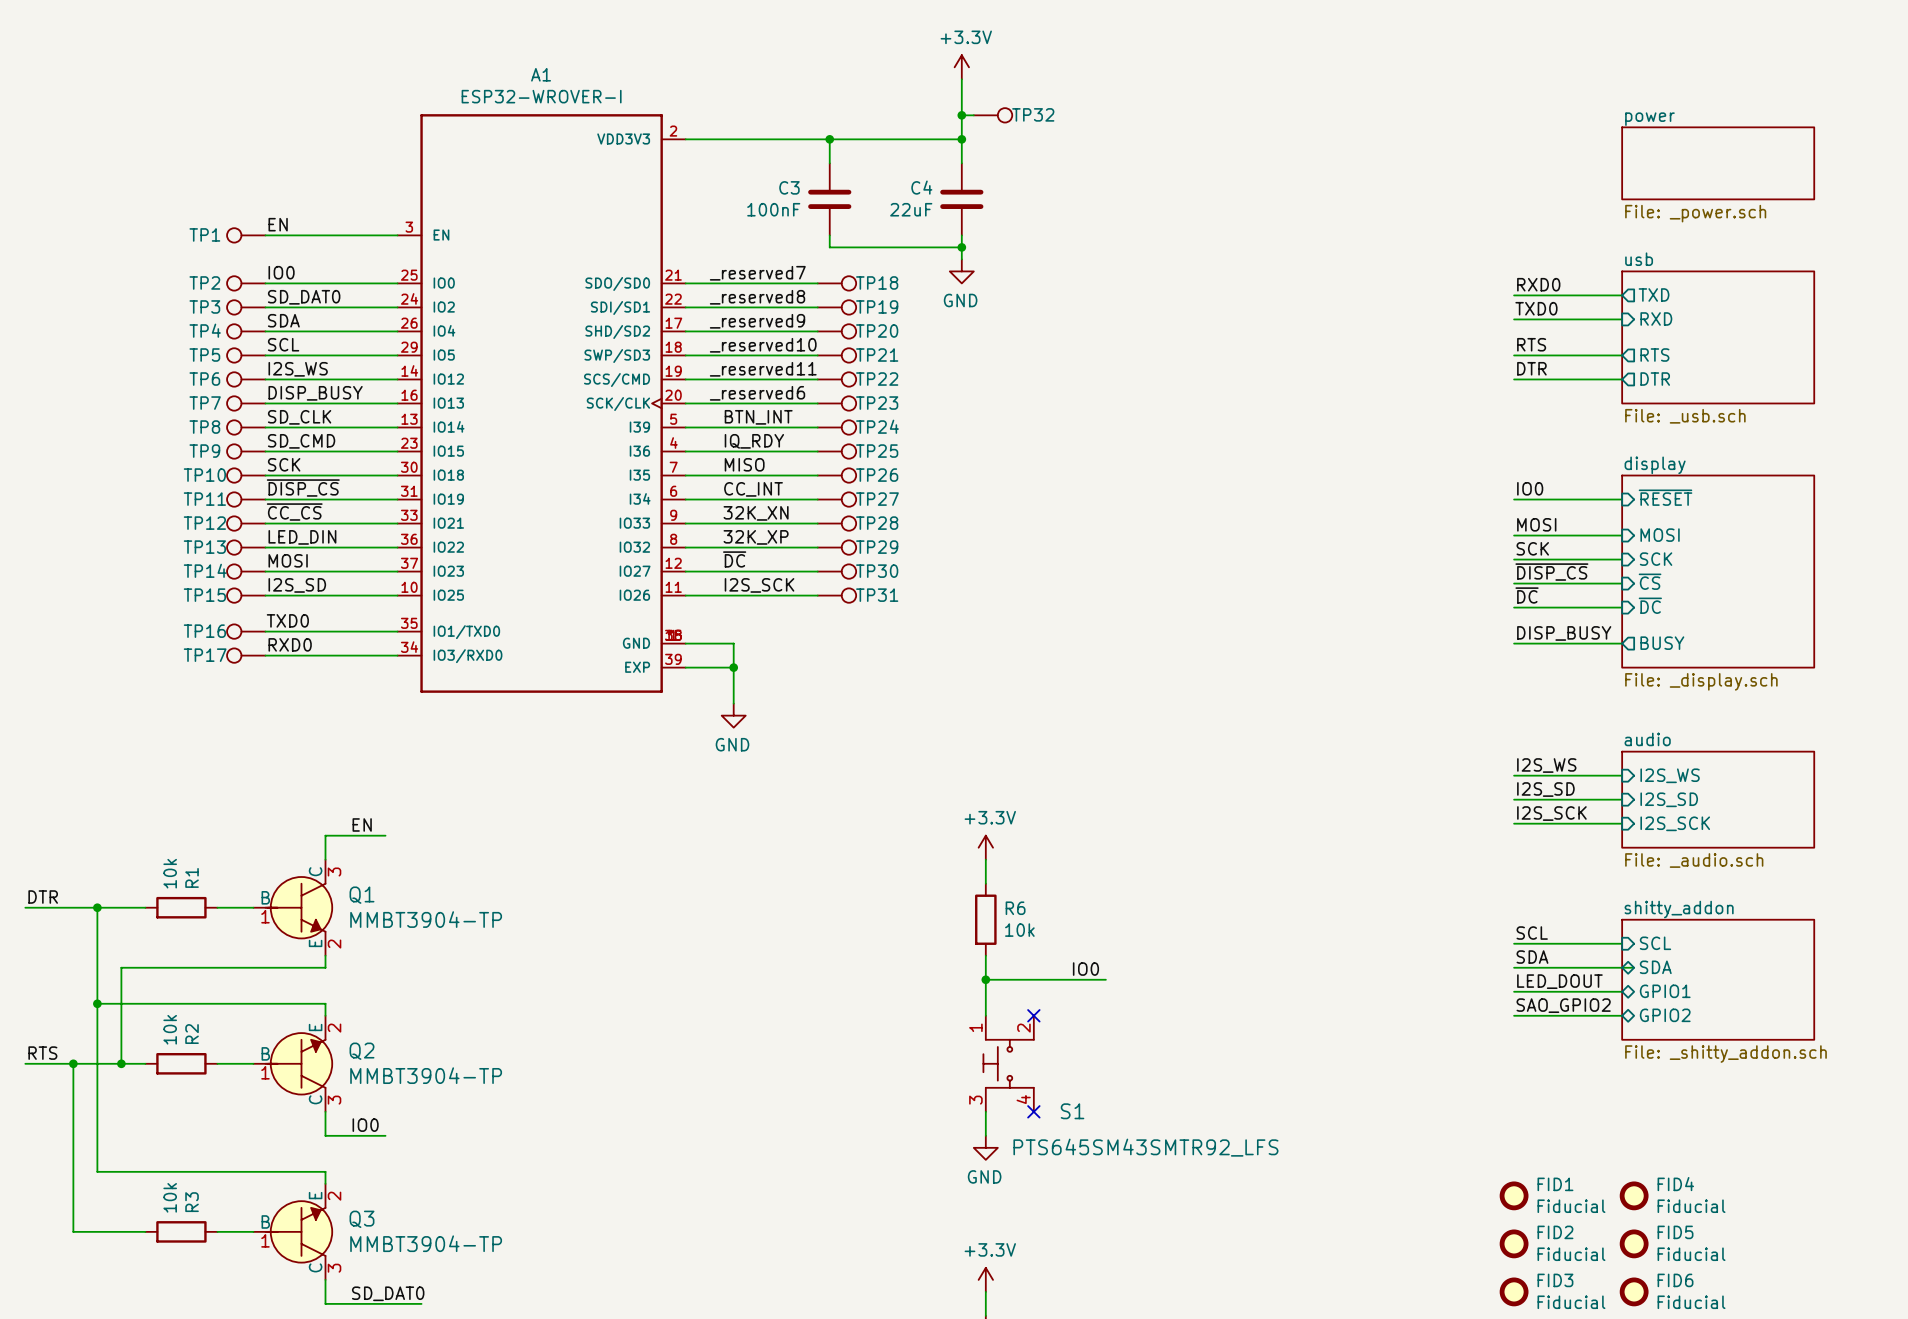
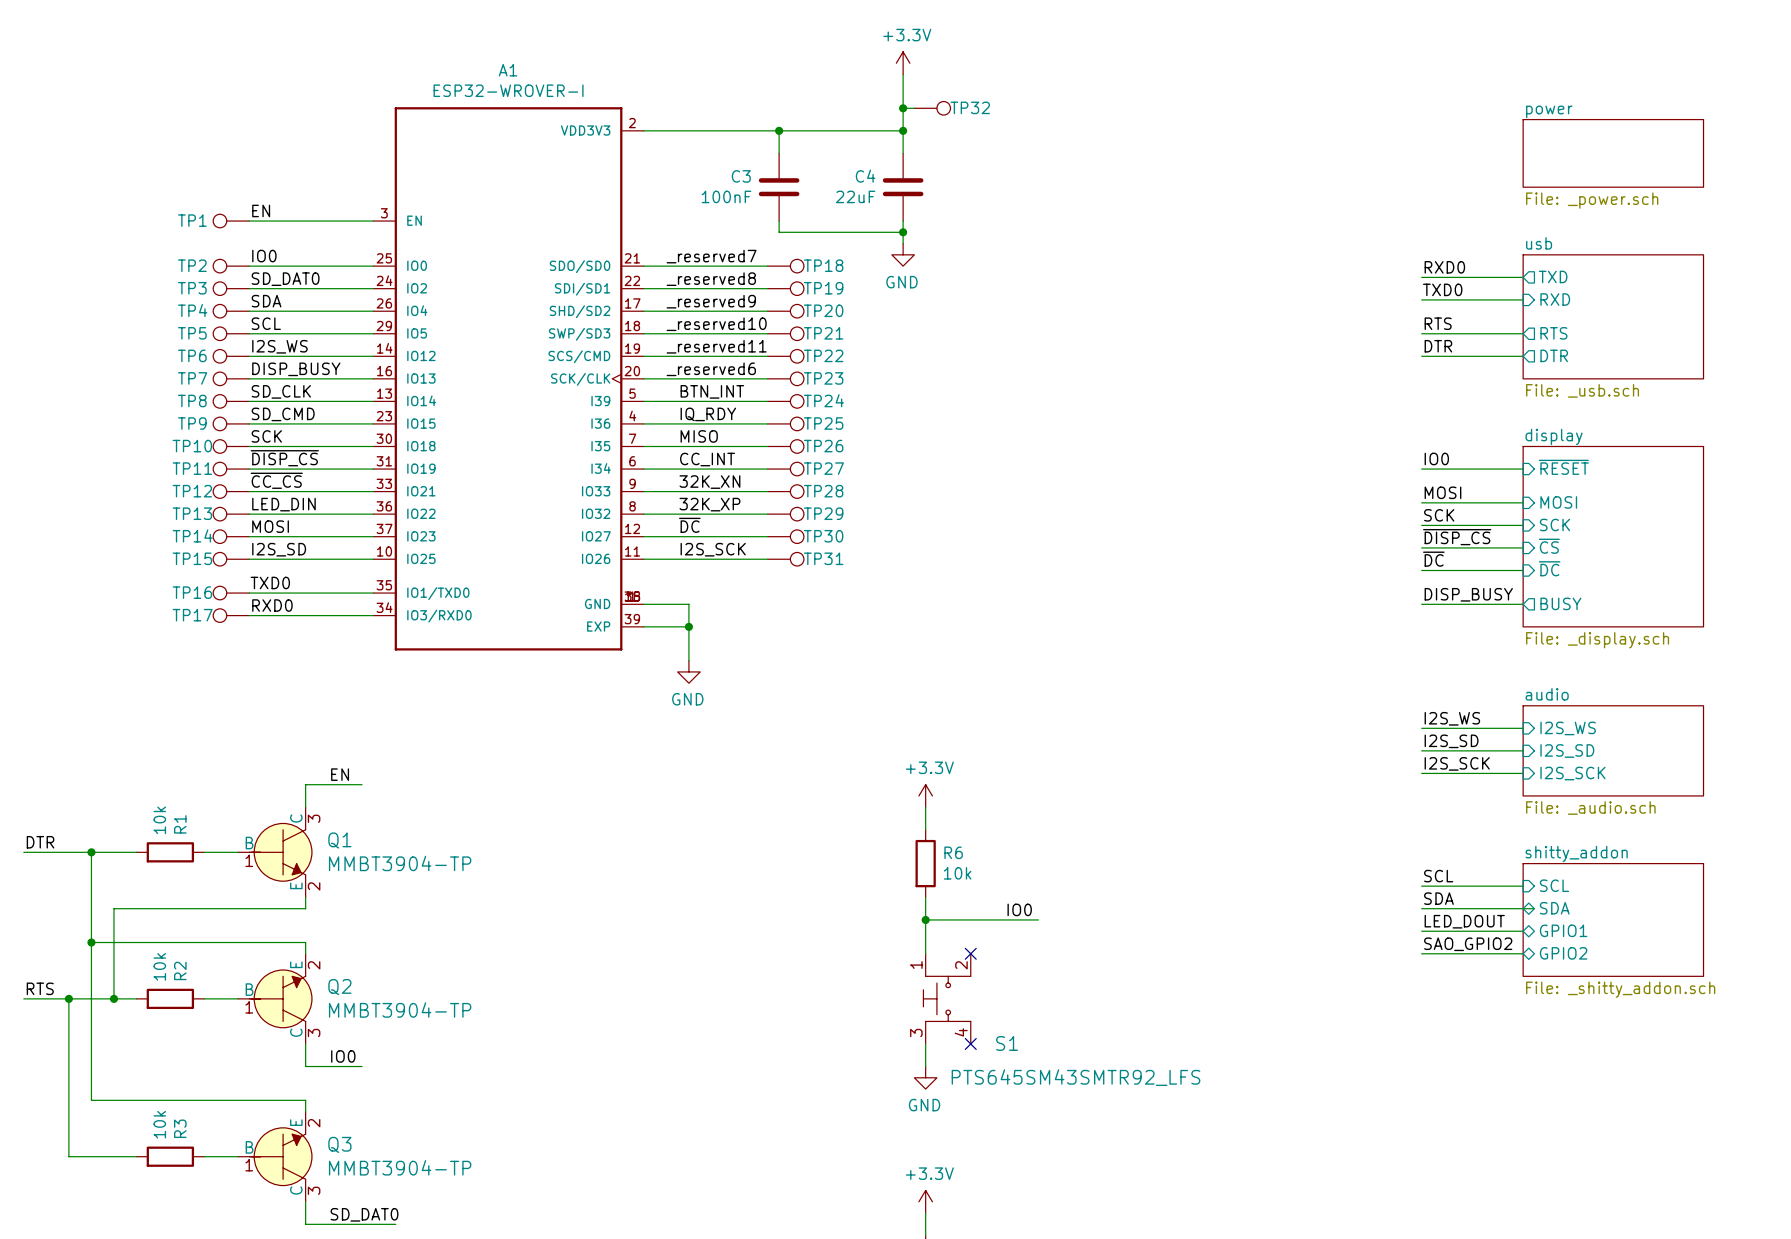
FID1: Fiducial (1514, 1195) -> none
FID4: Fiducial (1634, 1195) -> none
FID2: Fiducial (1514, 1243) -> none
FID5: Fiducial (1634, 1243) -> none
FID3: Fiducial (1514, 1291) -> none
FID6: Fiducial (1634, 1291) -> none

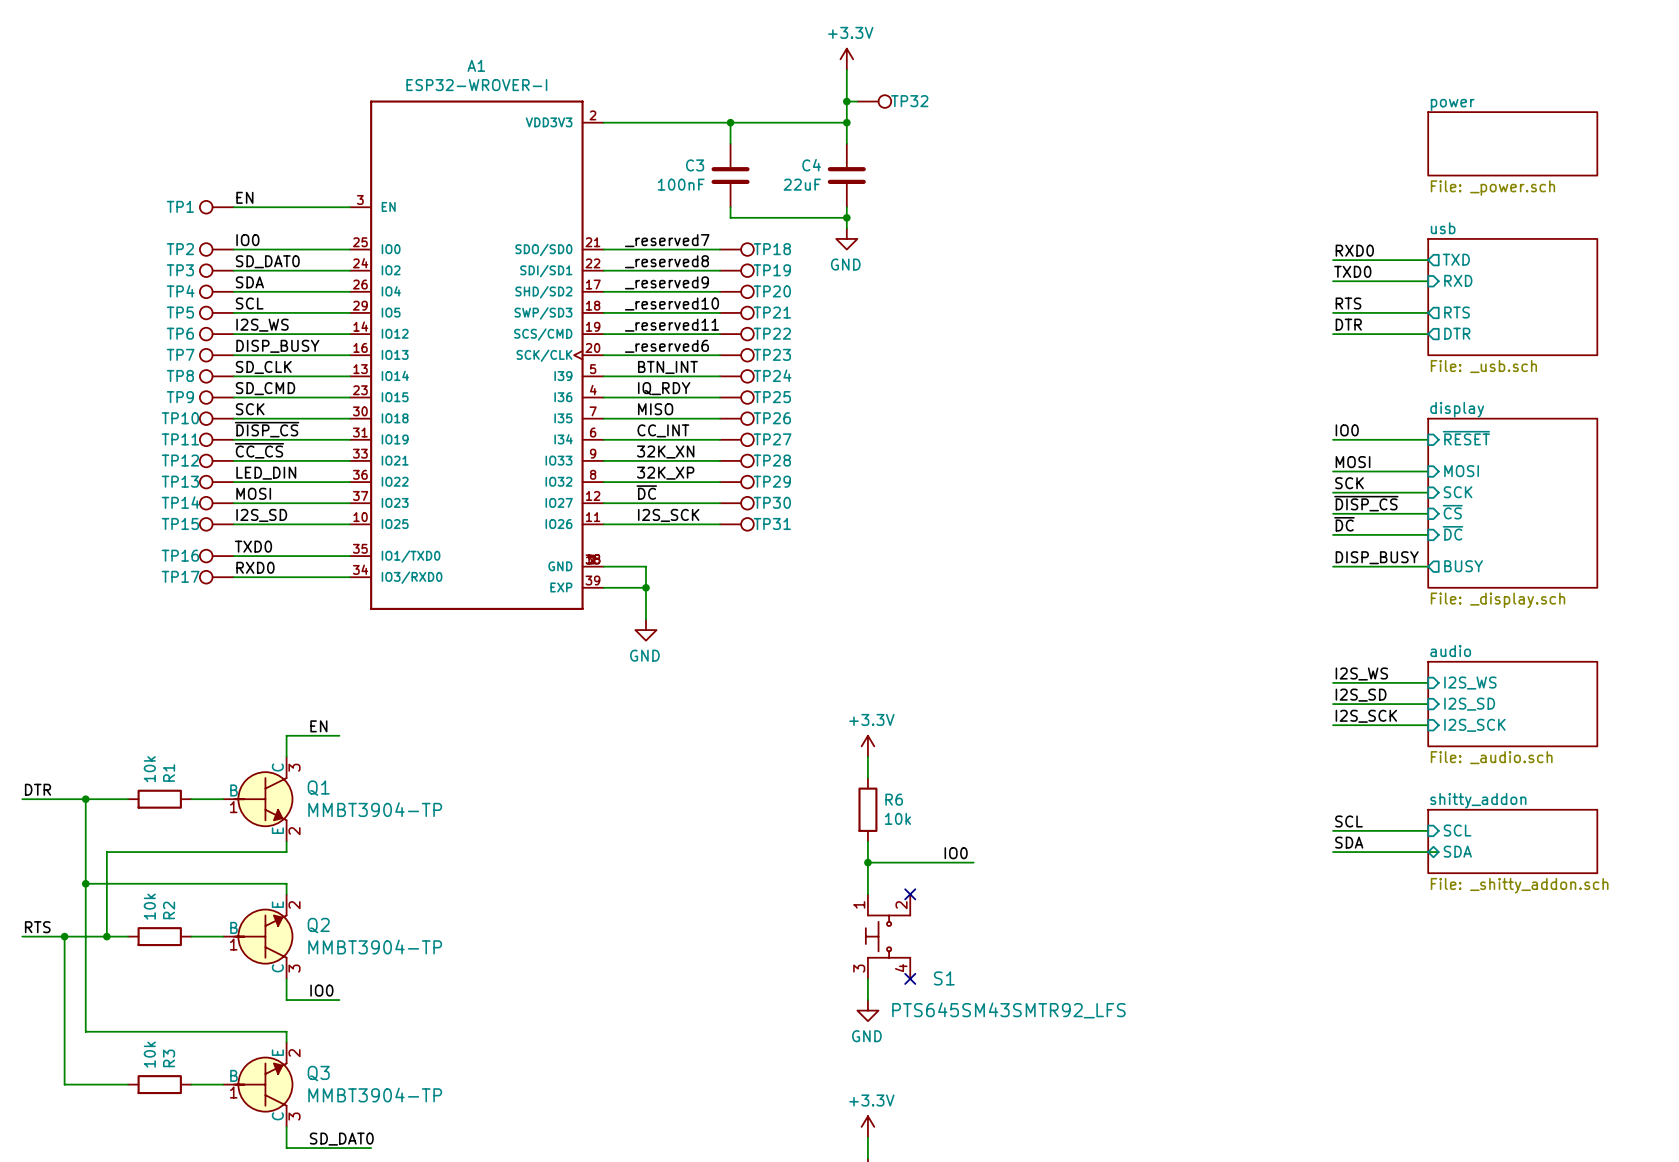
sheet shitty_addon: none -> File: _shitty_addon.sch (1512, 841)
sheet shitty_addon: File: _shitty_addon.sch (1613, 919) -> none
label: LED_DOUT (1464, 921) -> none
sheet pin: GPIO1 (1563, 930) -> none
wire: (1421, 931) (1523, 931) -> none
label: SAO_GPIO2 (1468, 944) -> none
wire: (1421, 953) (1523, 953) -> none
sheet pin: GPIO2 (1563, 953) -> none

